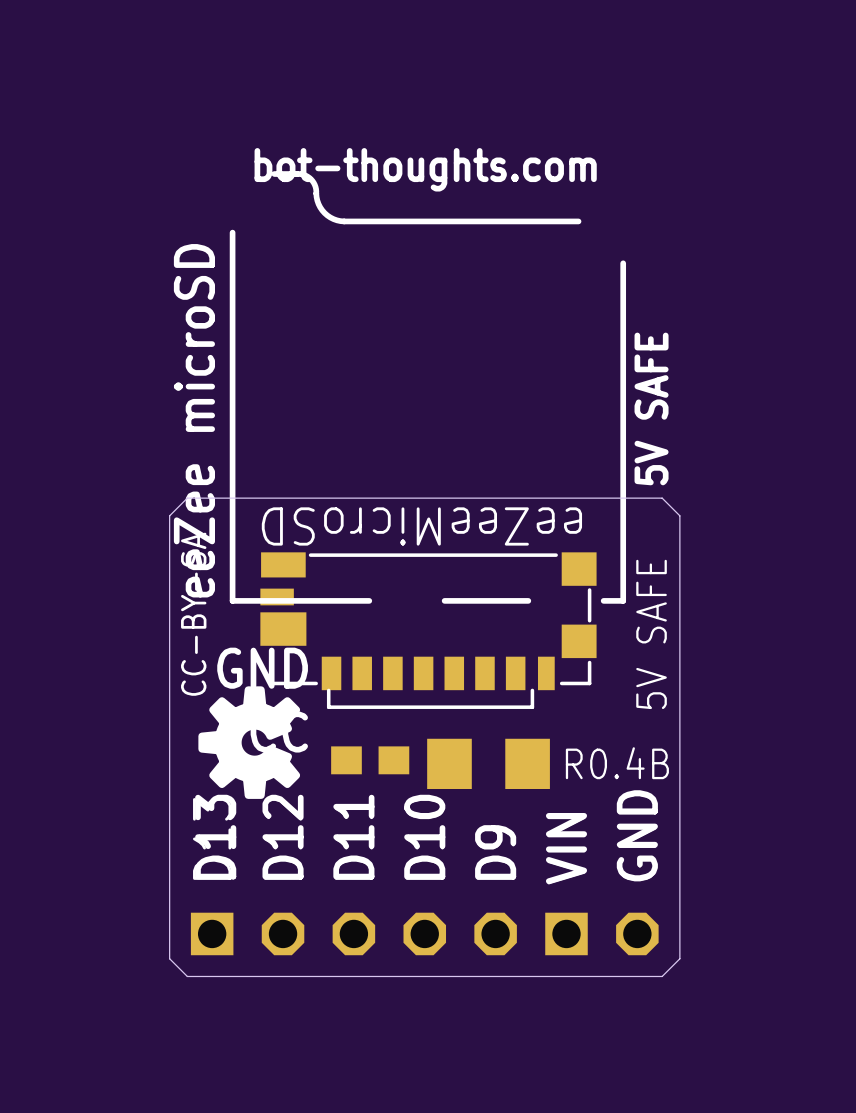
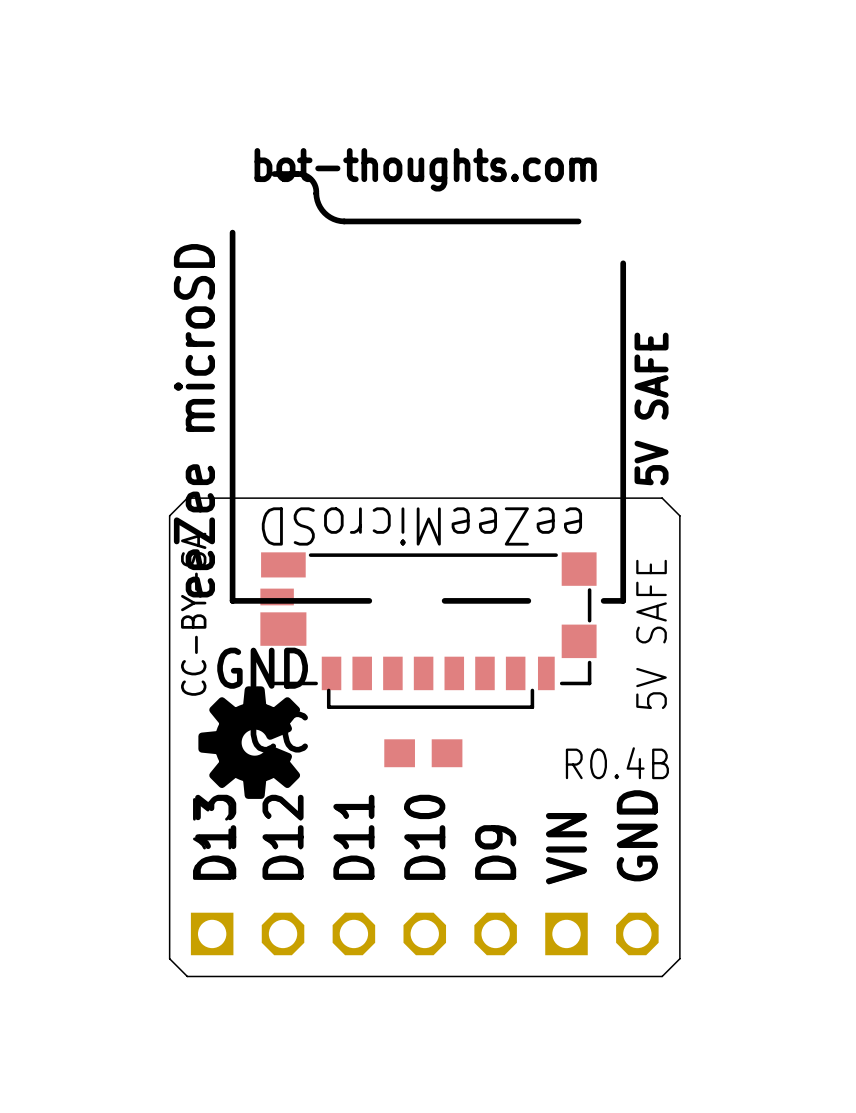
part position: (370, 760) -> (423, 753)
part: (488, 763) -> none

